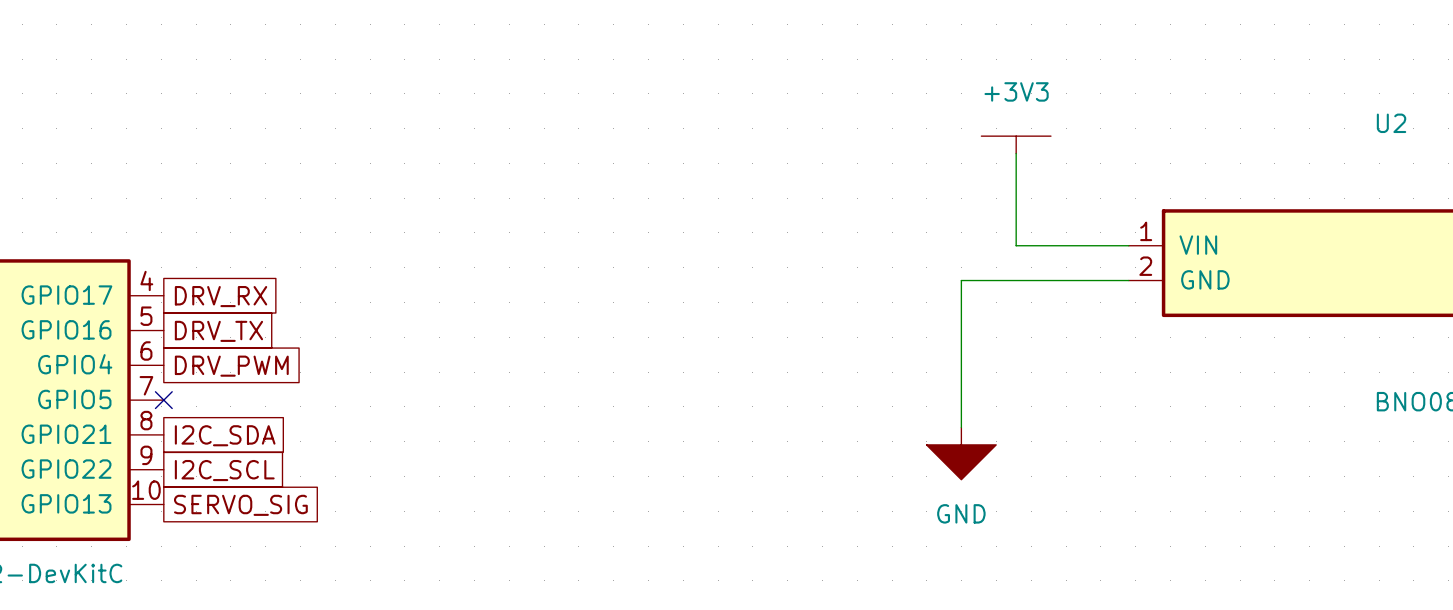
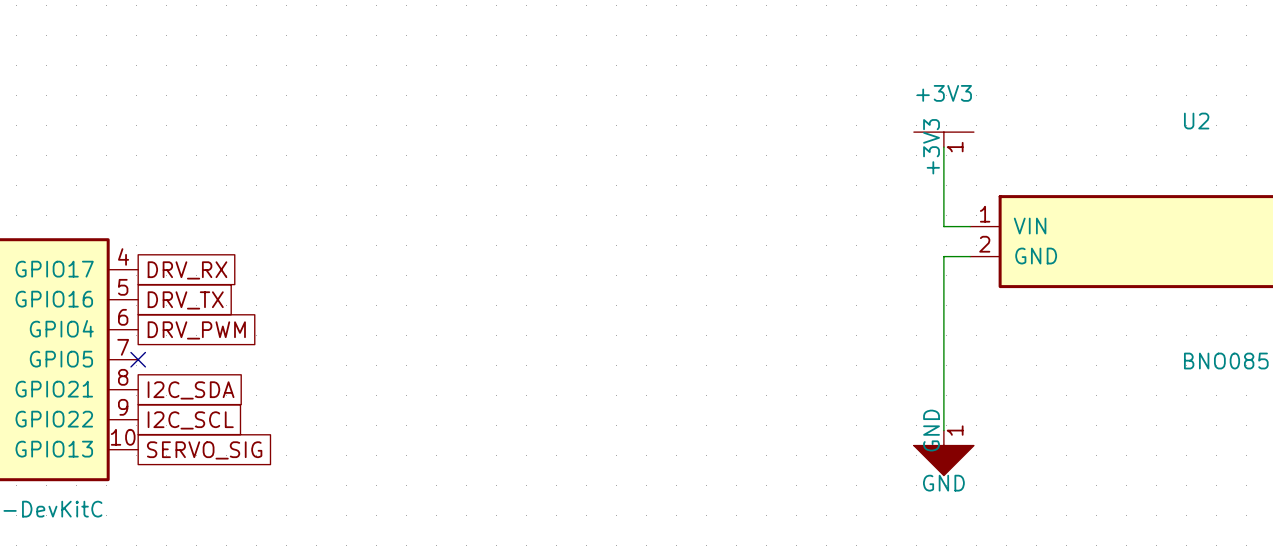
power symbol: +3V3 (1016, 144) -> none
power symbol: none -> +3V3 (943, 139)
wire: (1016, 153) (1016, 245) (1098, 245) -> (943, 147) (943, 226)
wire: (1098, 280) (961, 280) (961, 427) -> (943, 256) (943, 430)
power symbol: GND (961, 453) -> none
power symbol: none -> GND (943, 453)

